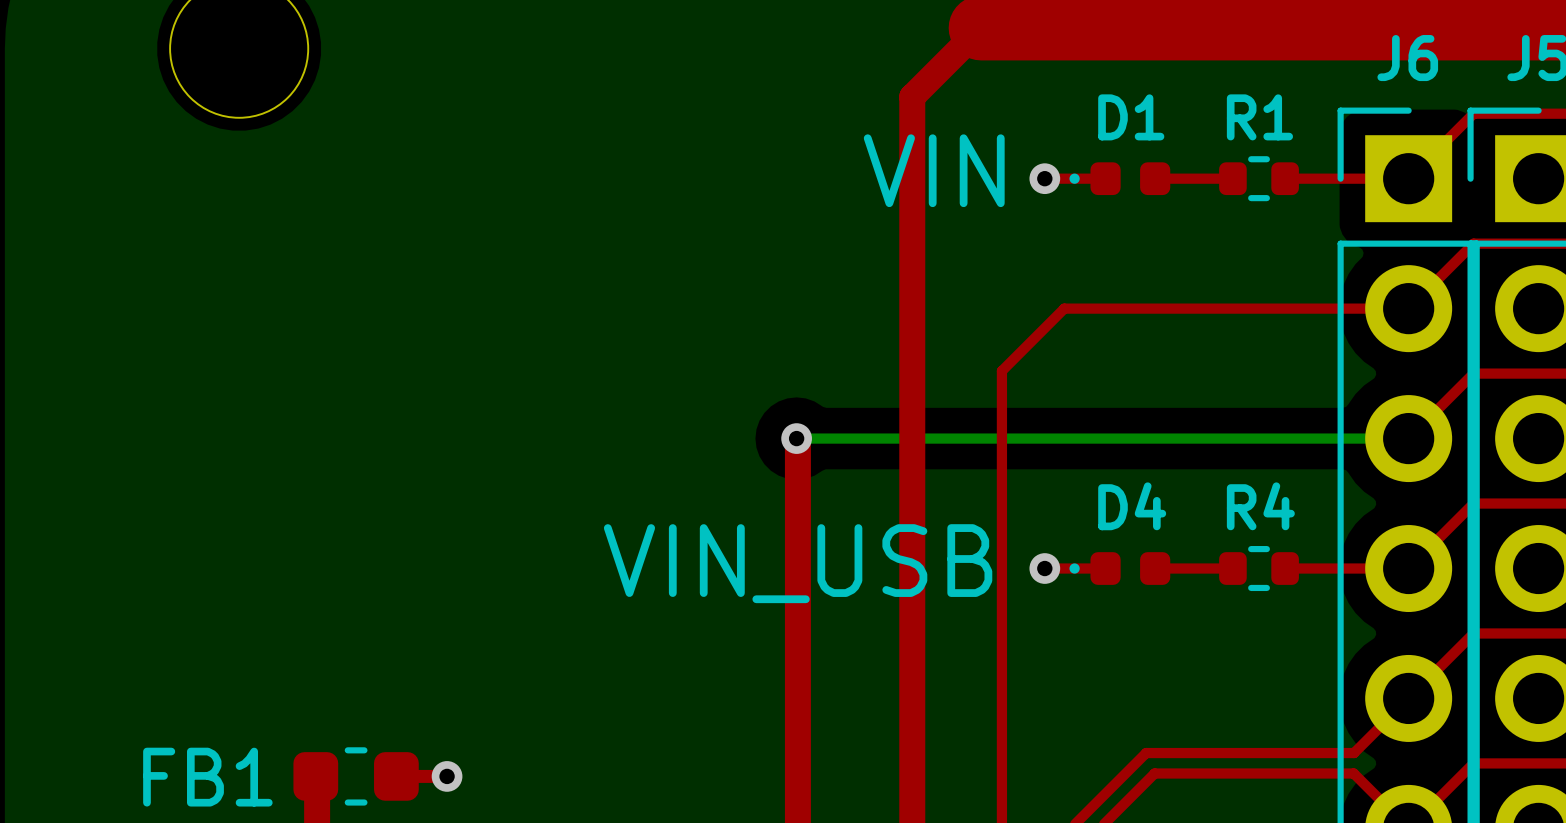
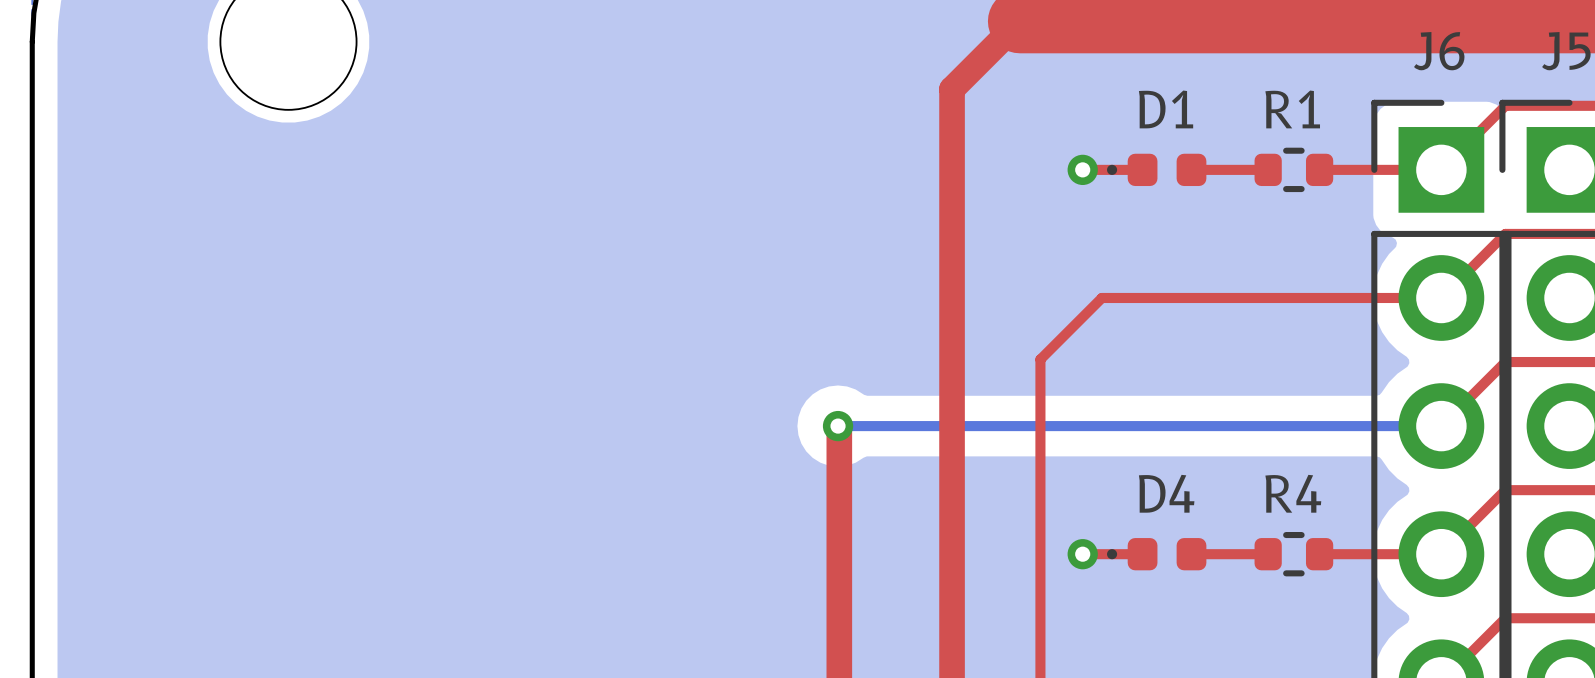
text: VIN (934, 170) -> none
text: VIN_USB (798, 563) -> none

